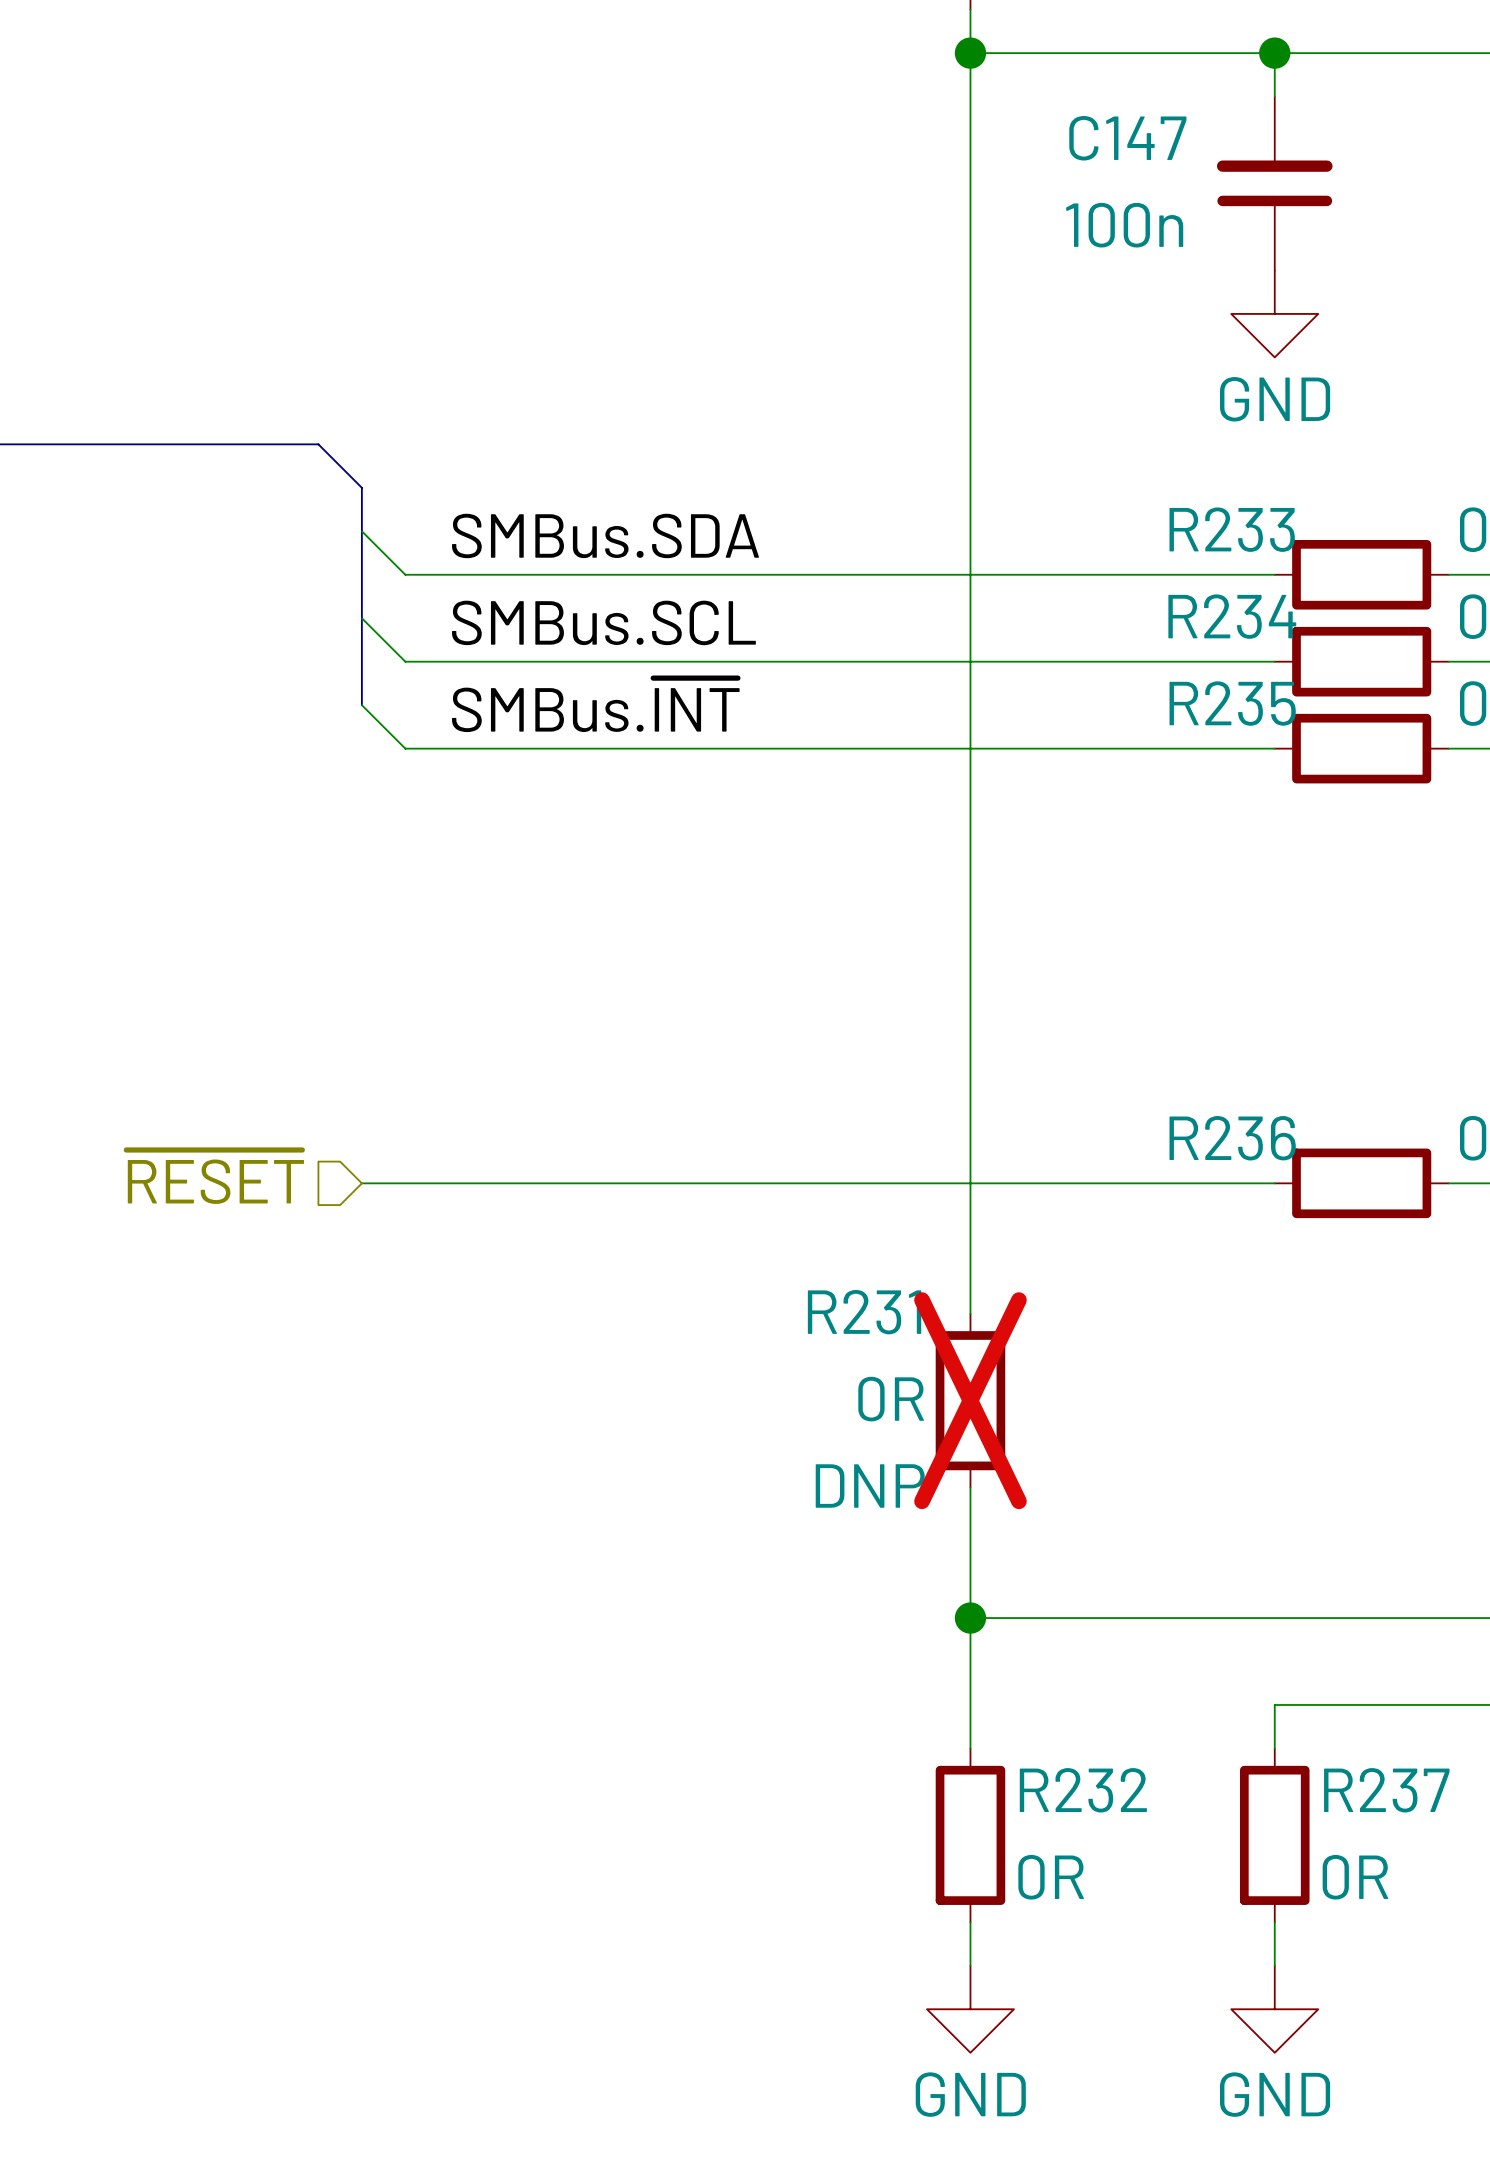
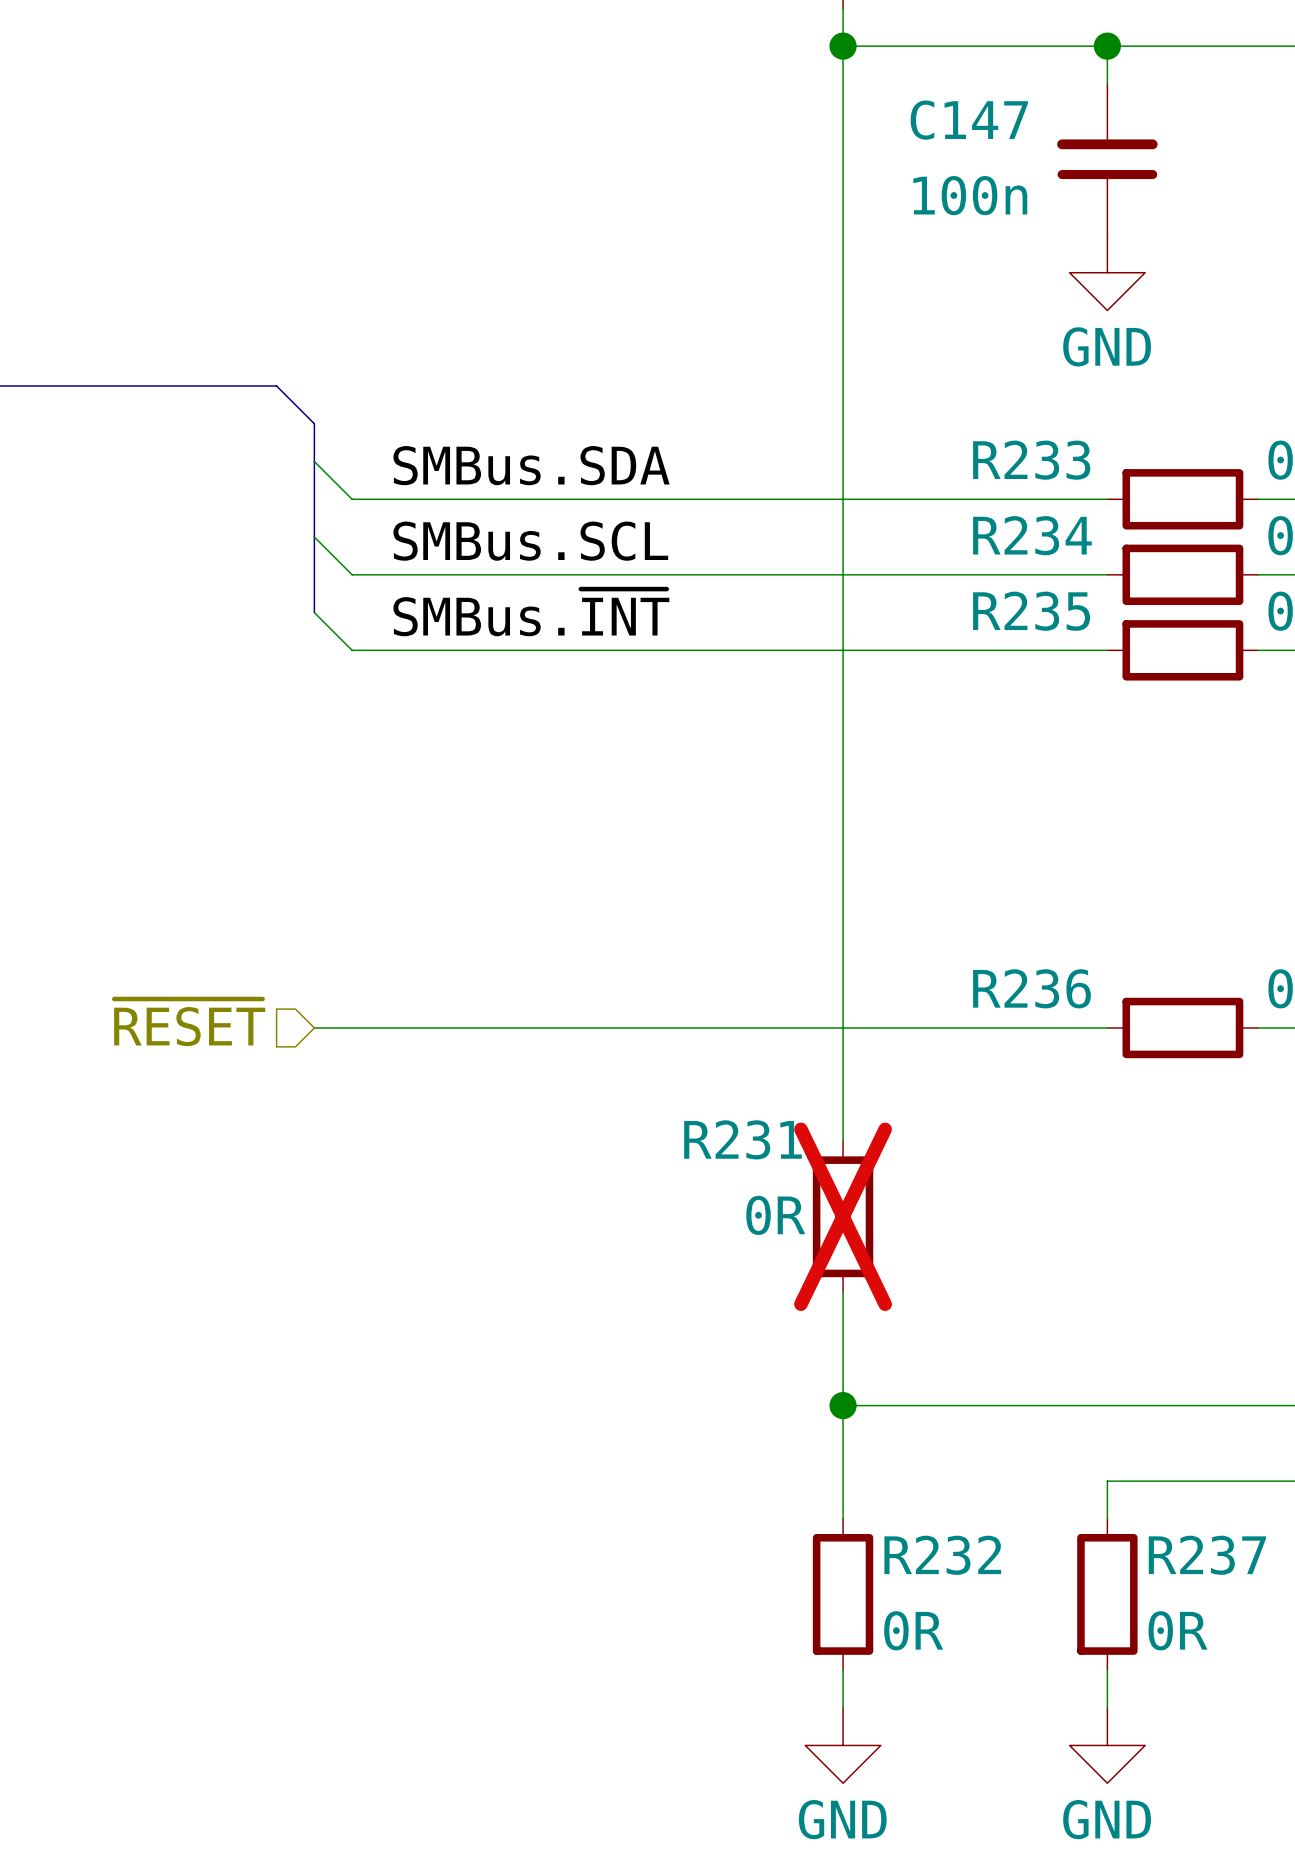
R233 name position: R233 (1232, 529) -> R233 (1031, 460)
R234 name position: R234 (1232, 616) -> R234 (1032, 535)
R235 name position: R235 (1232, 703) -> R235 (1031, 611)
R236 name position: R236 (1232, 1138) -> R236 (1031, 988)
R231 text: DNP (870, 1485) -> none

